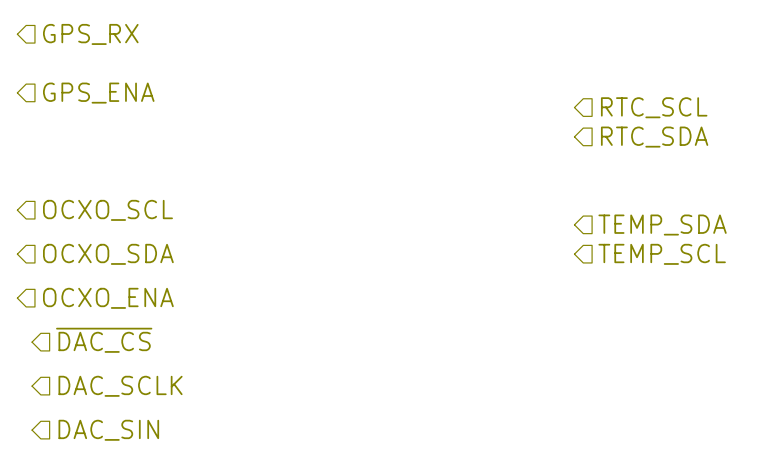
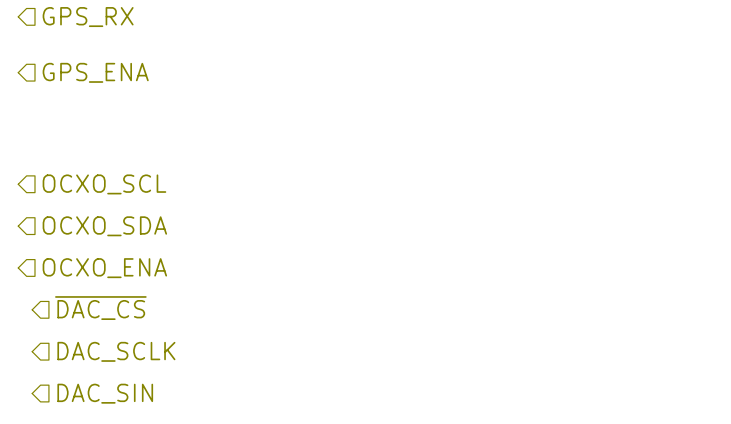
hierarchical label: RTC_SCL (654, 107) -> none
hierarchical label: RTC_SDA (654, 137) -> none
hierarchical label: TEMP_SDA (662, 225) -> none
hierarchical label: TEMP_SCL (662, 254) -> none

